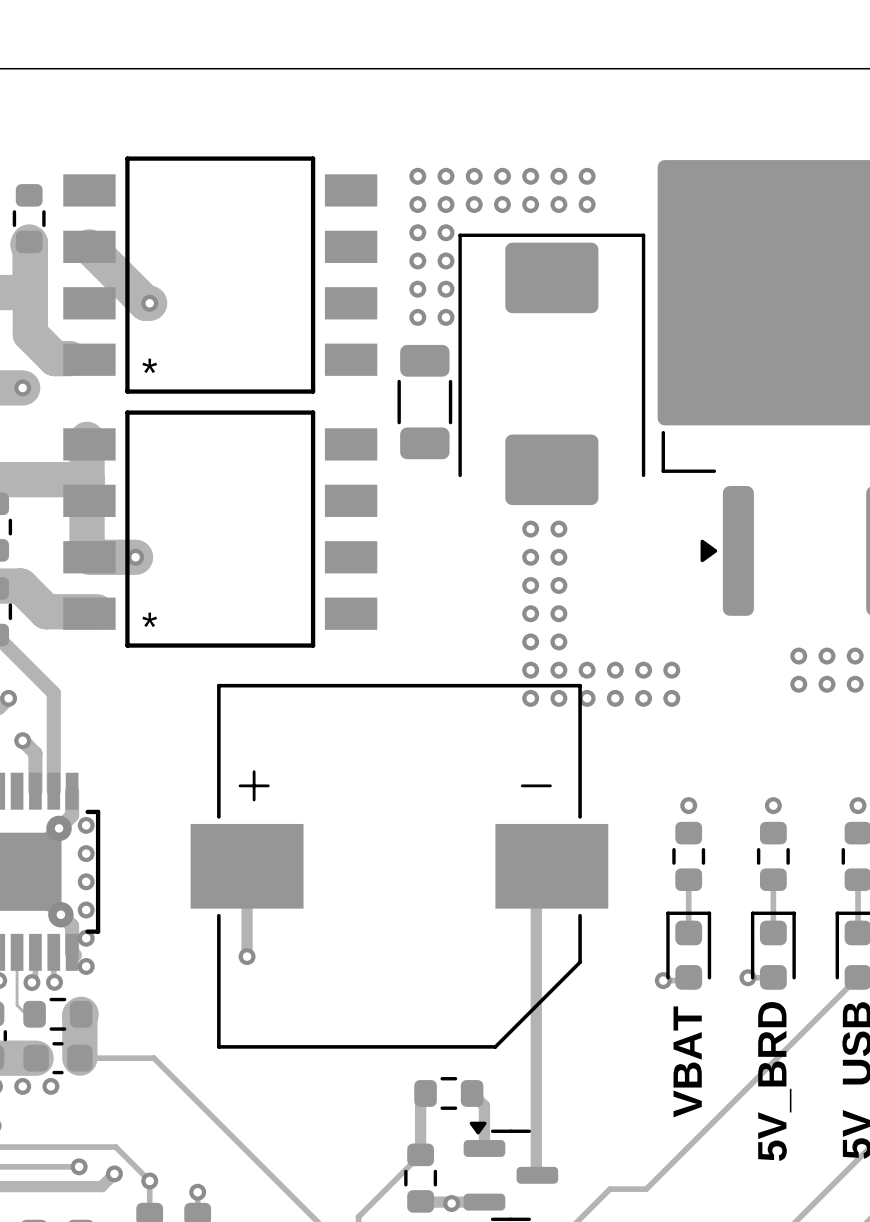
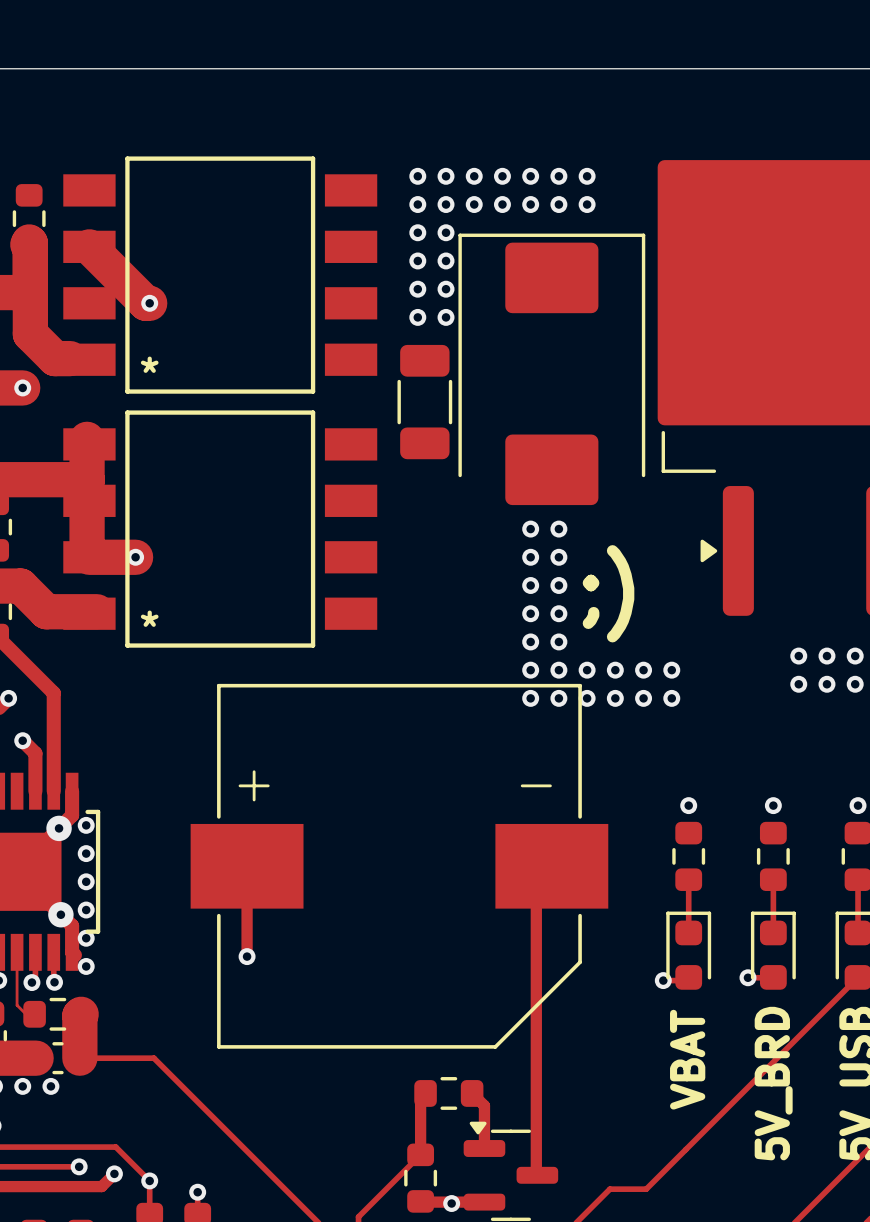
text: none -> ;) (608, 593)

